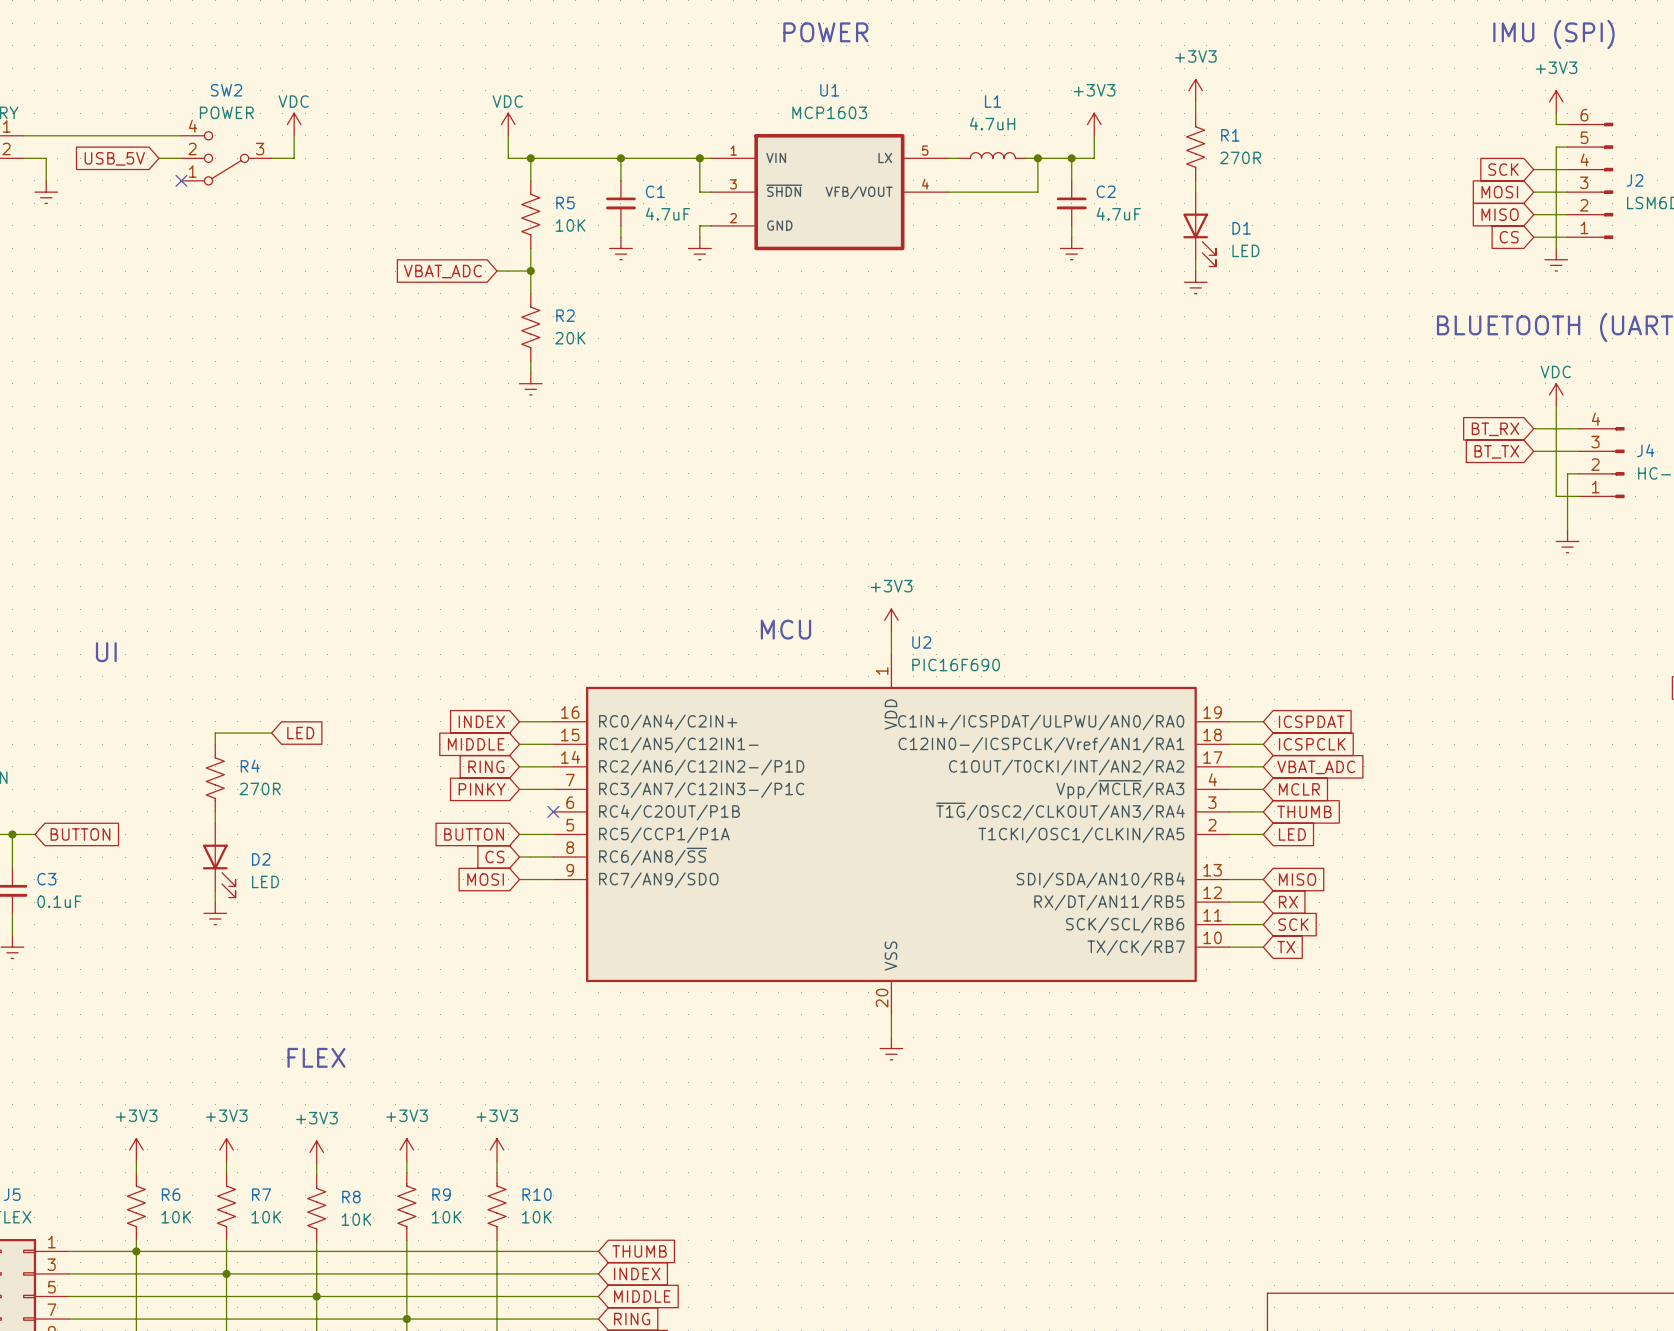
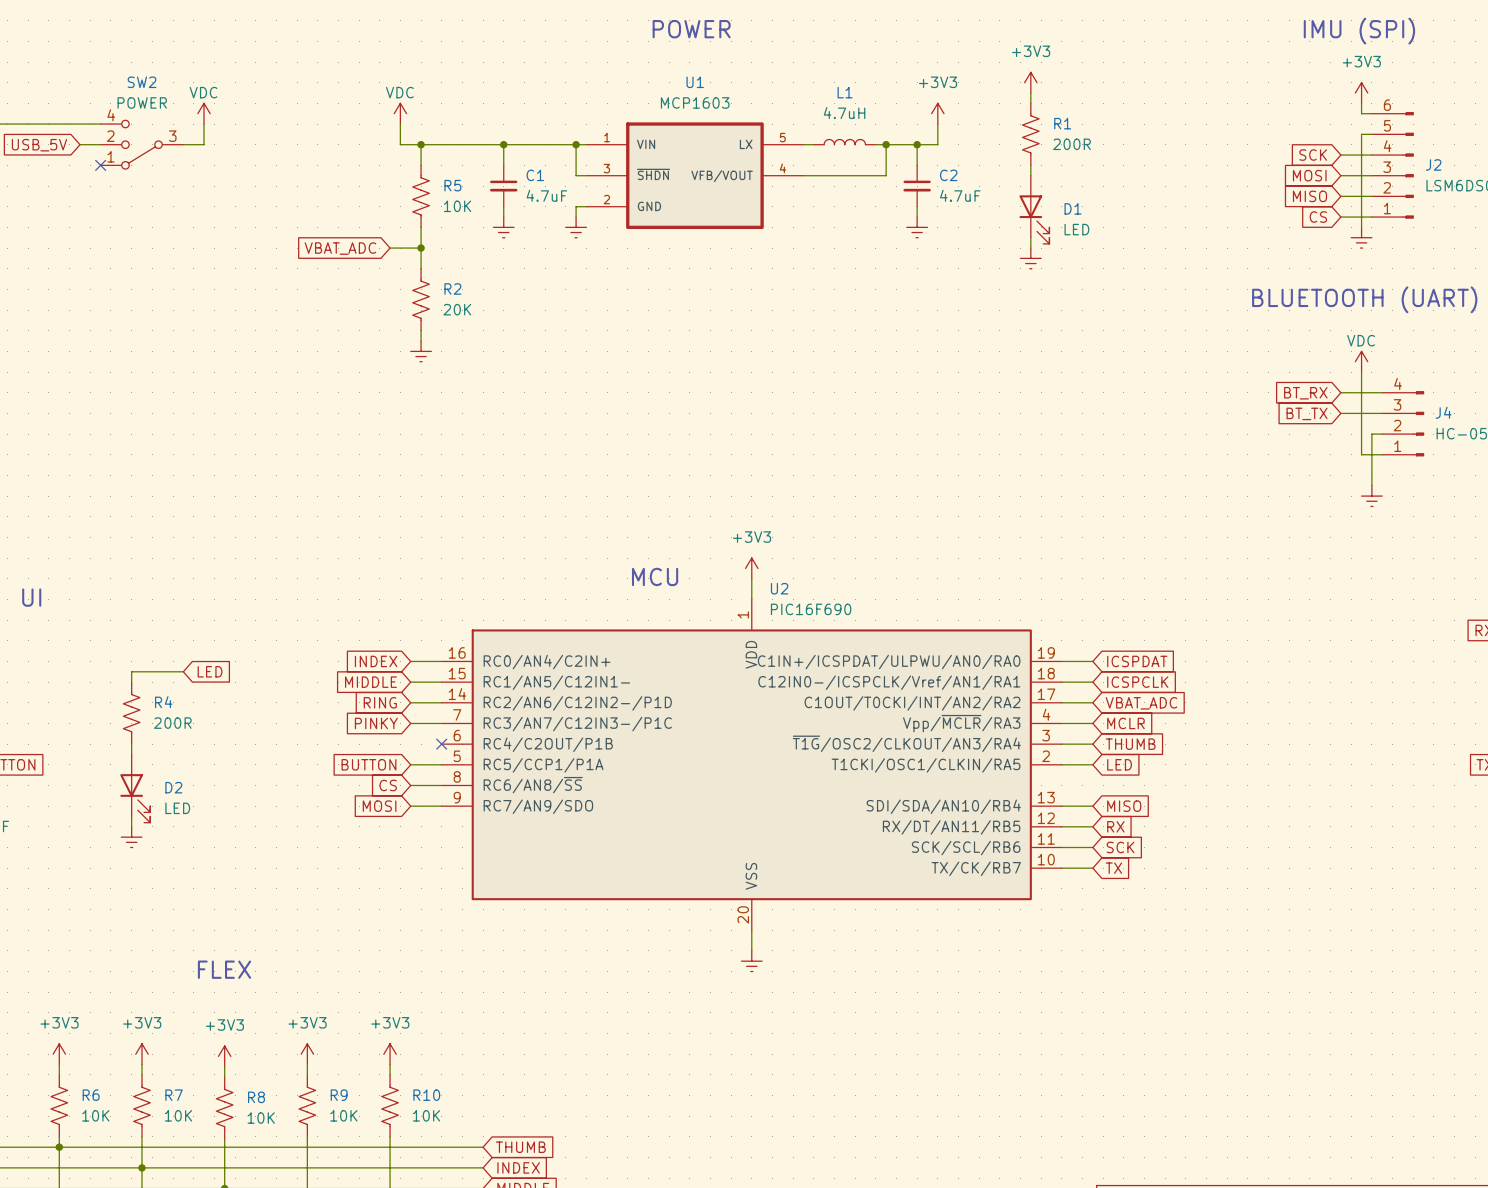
R1 value: 270R (1240, 157) -> 200R (1072, 144)
R4 value: 270R (260, 788) -> 200R (172, 723)

